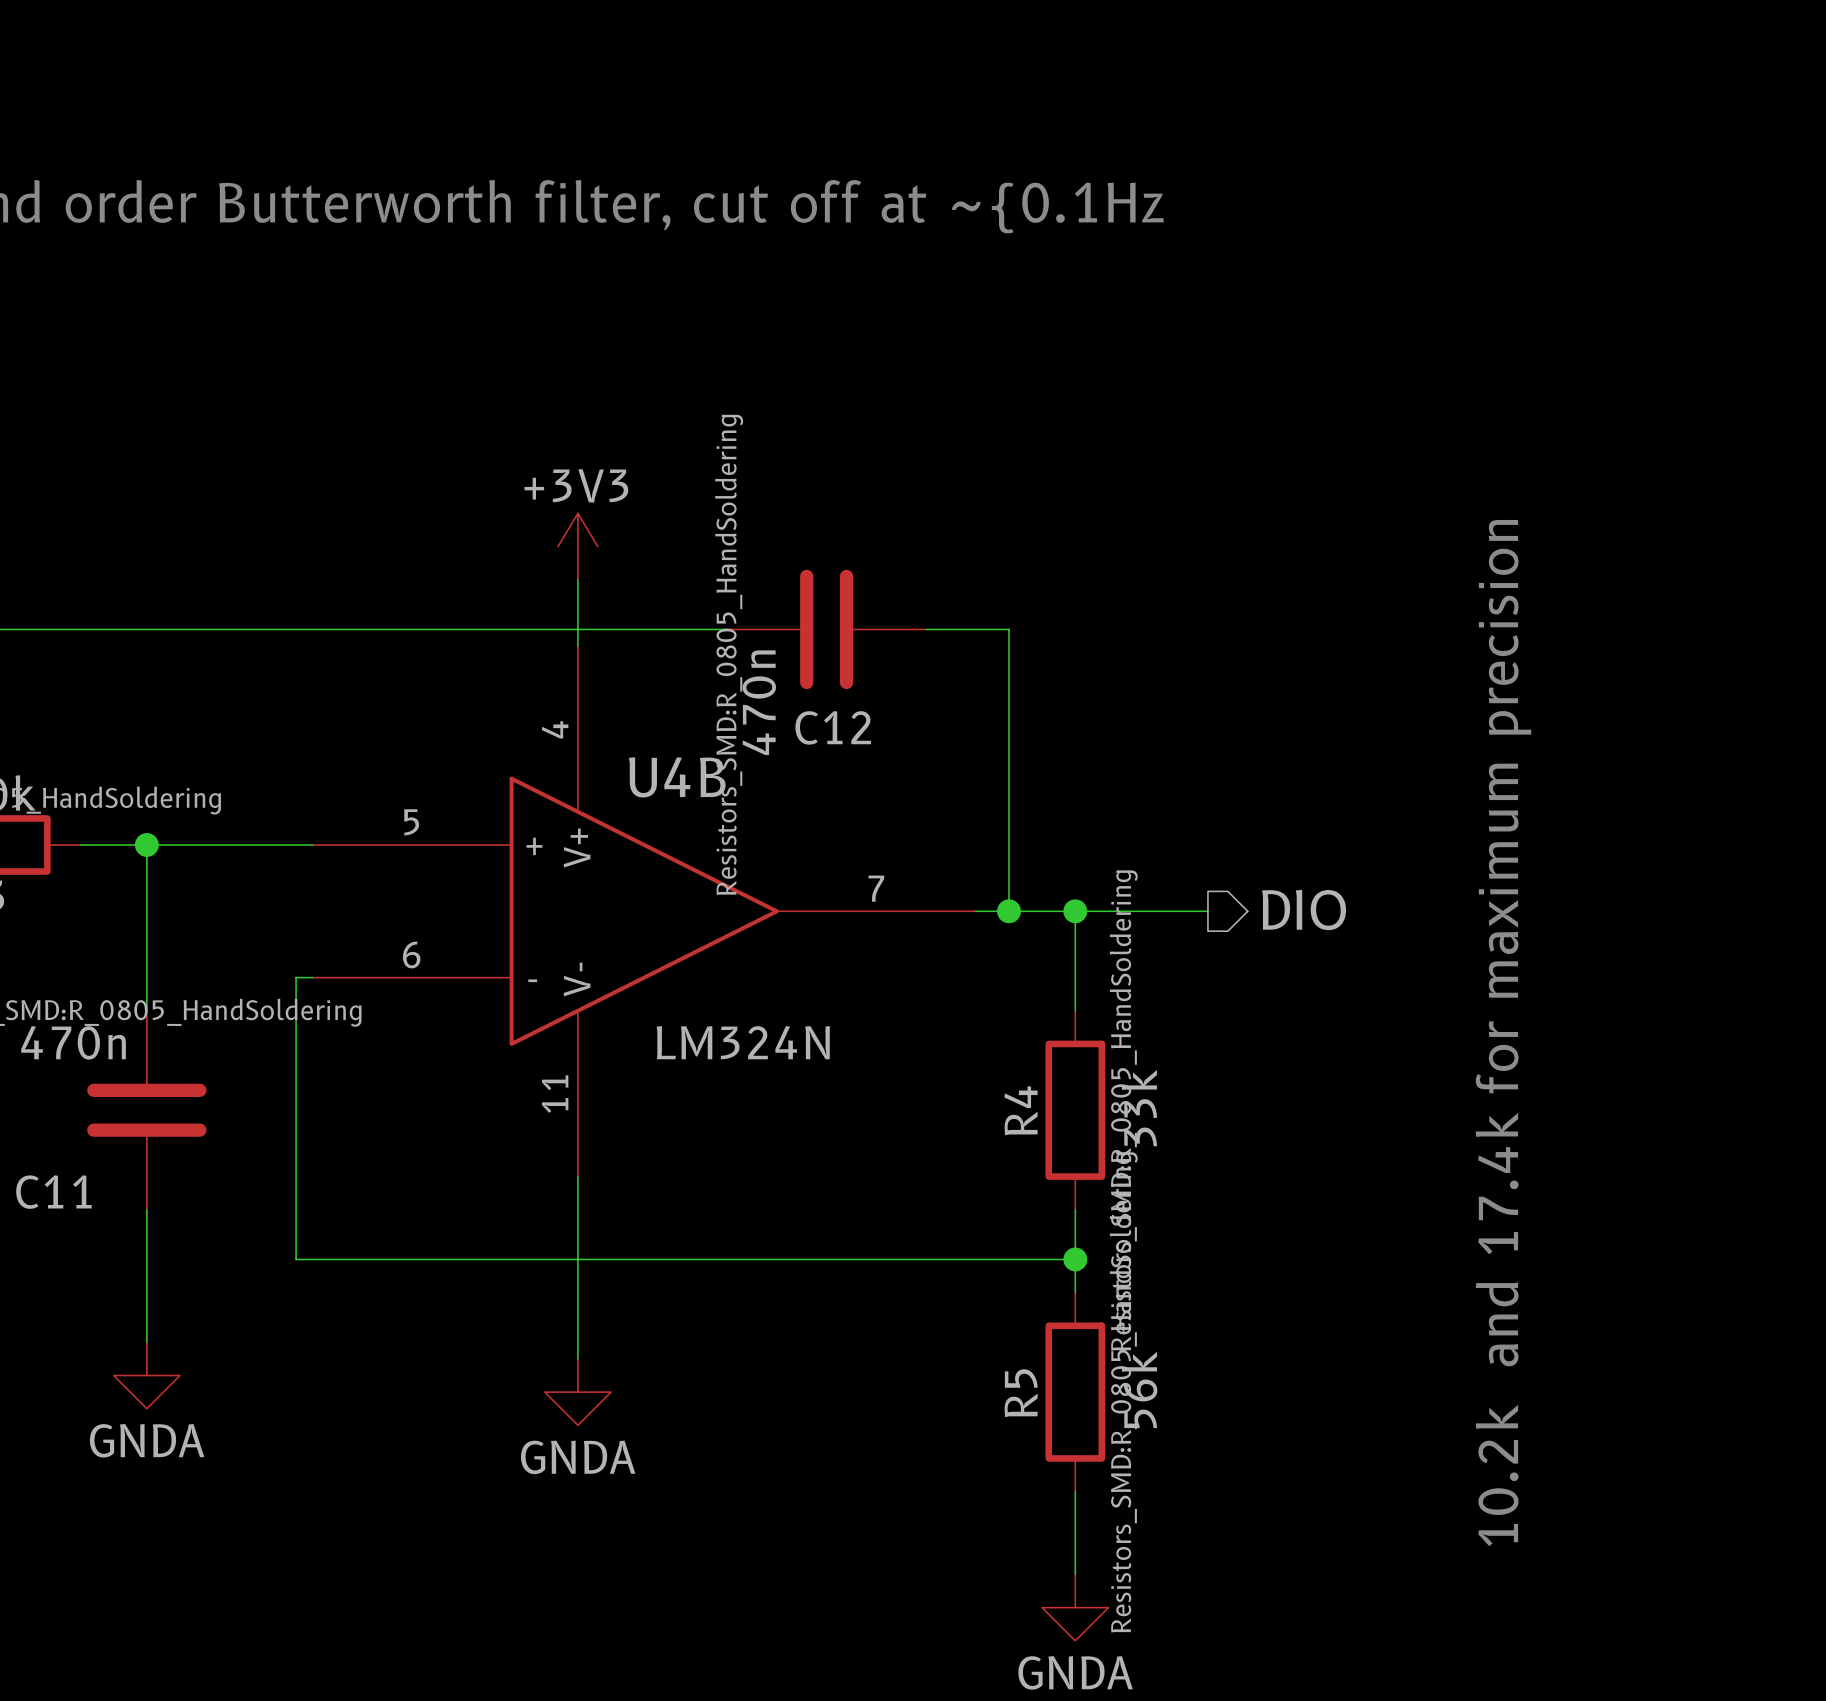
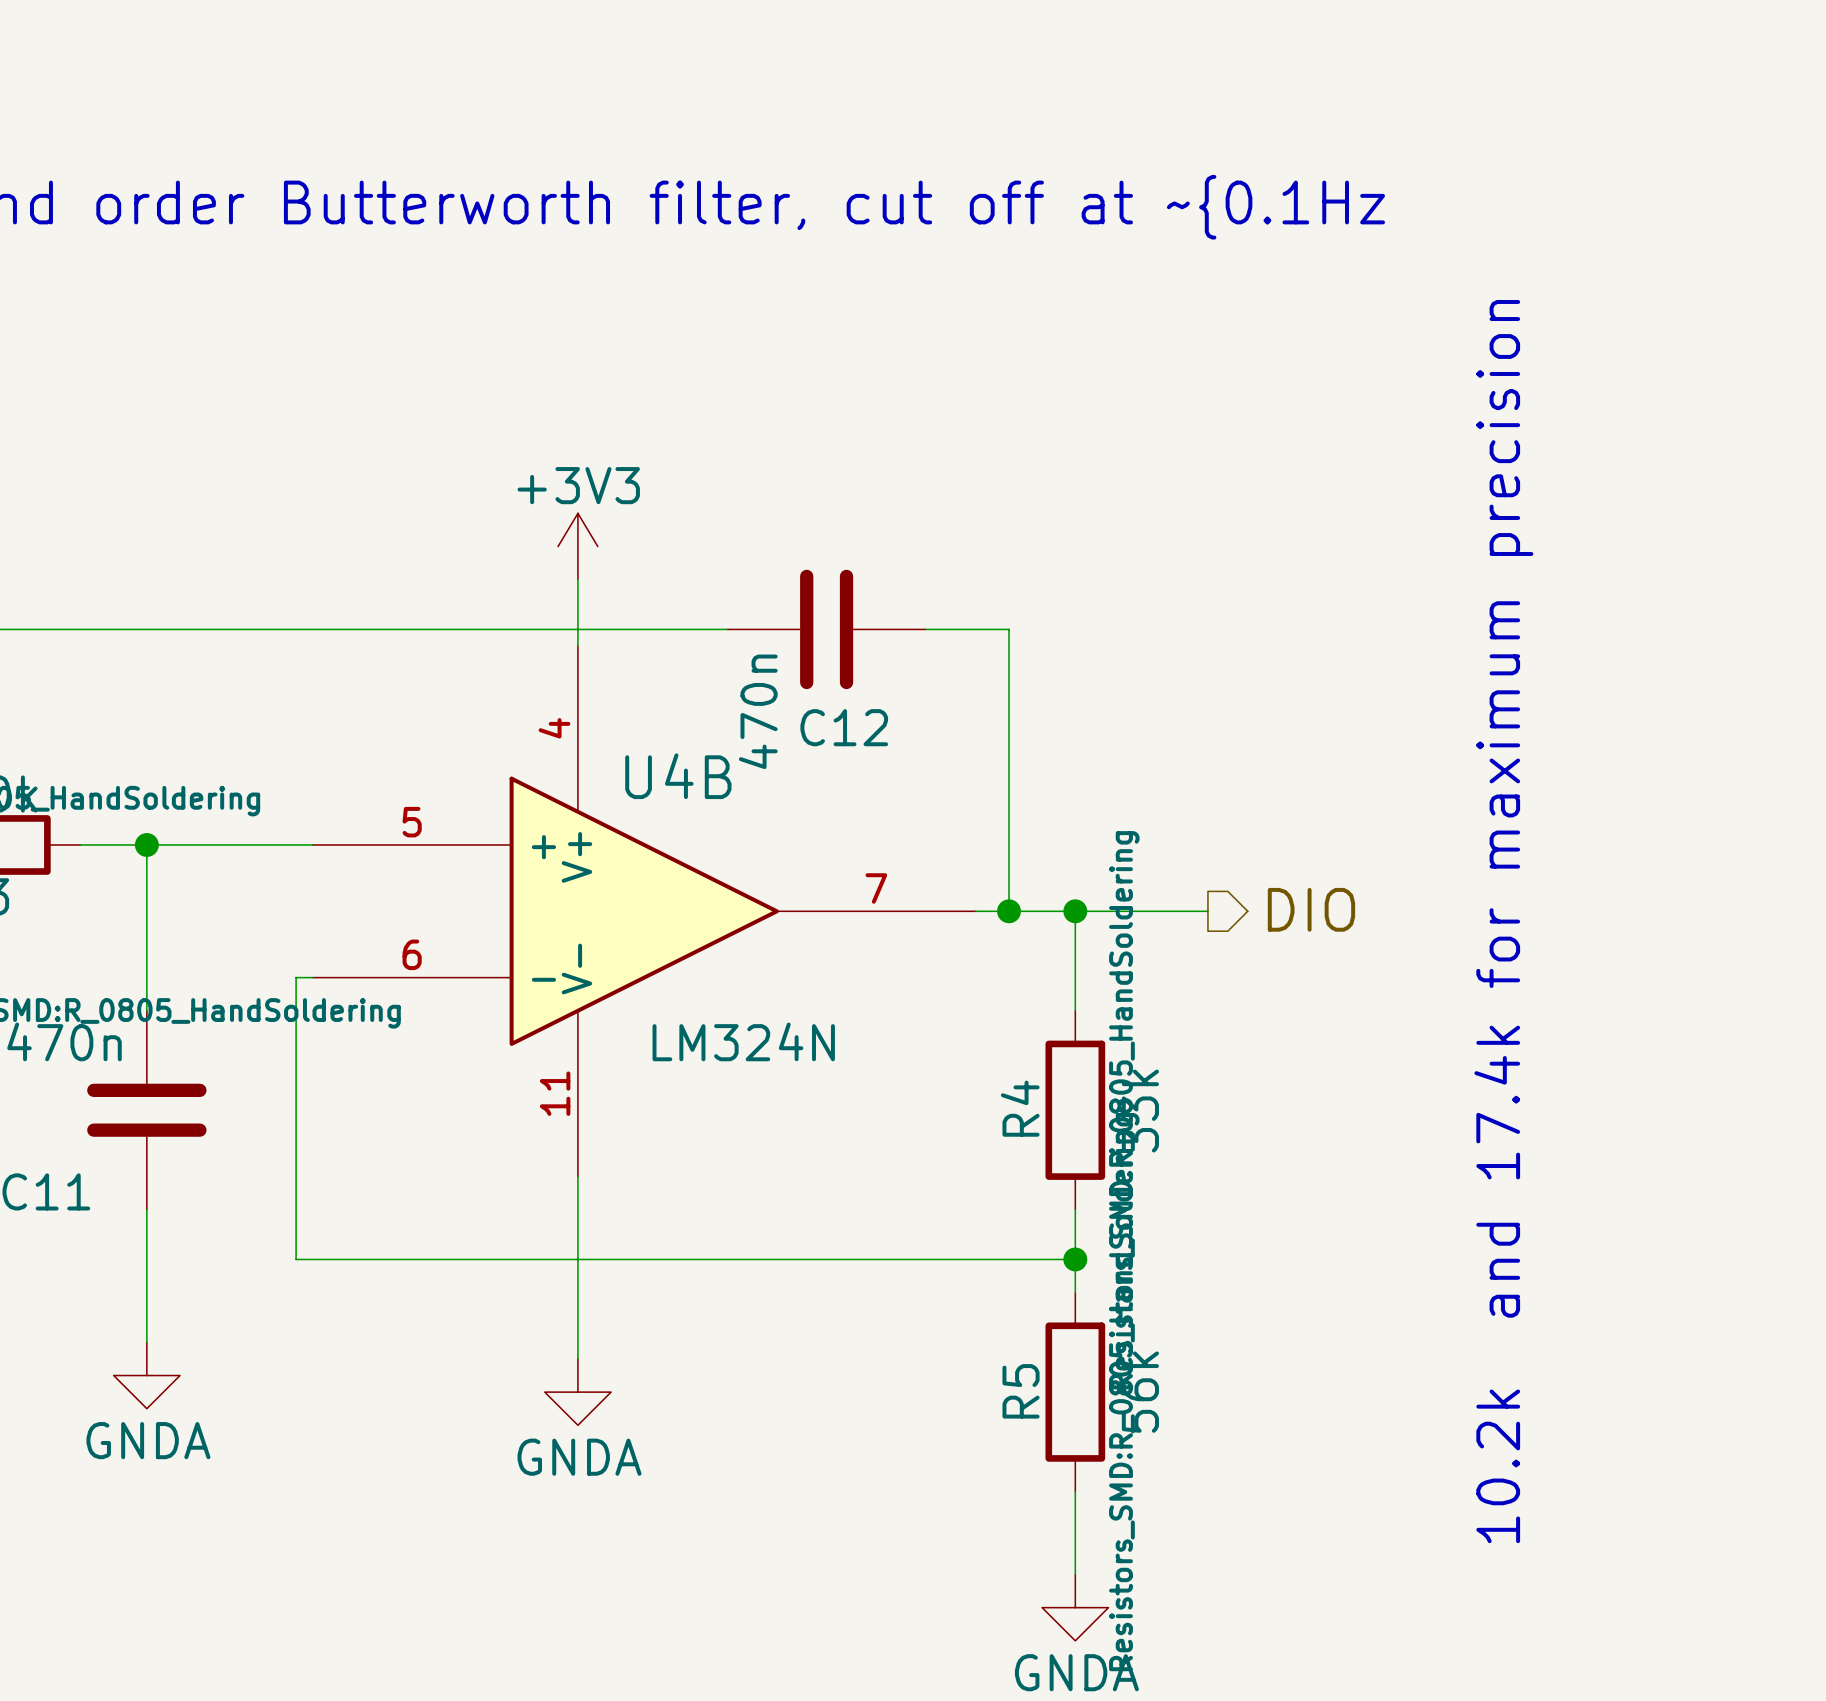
C12 text: Resistors_SMD:R_0805_HandSoldering (729, 654) -> none

